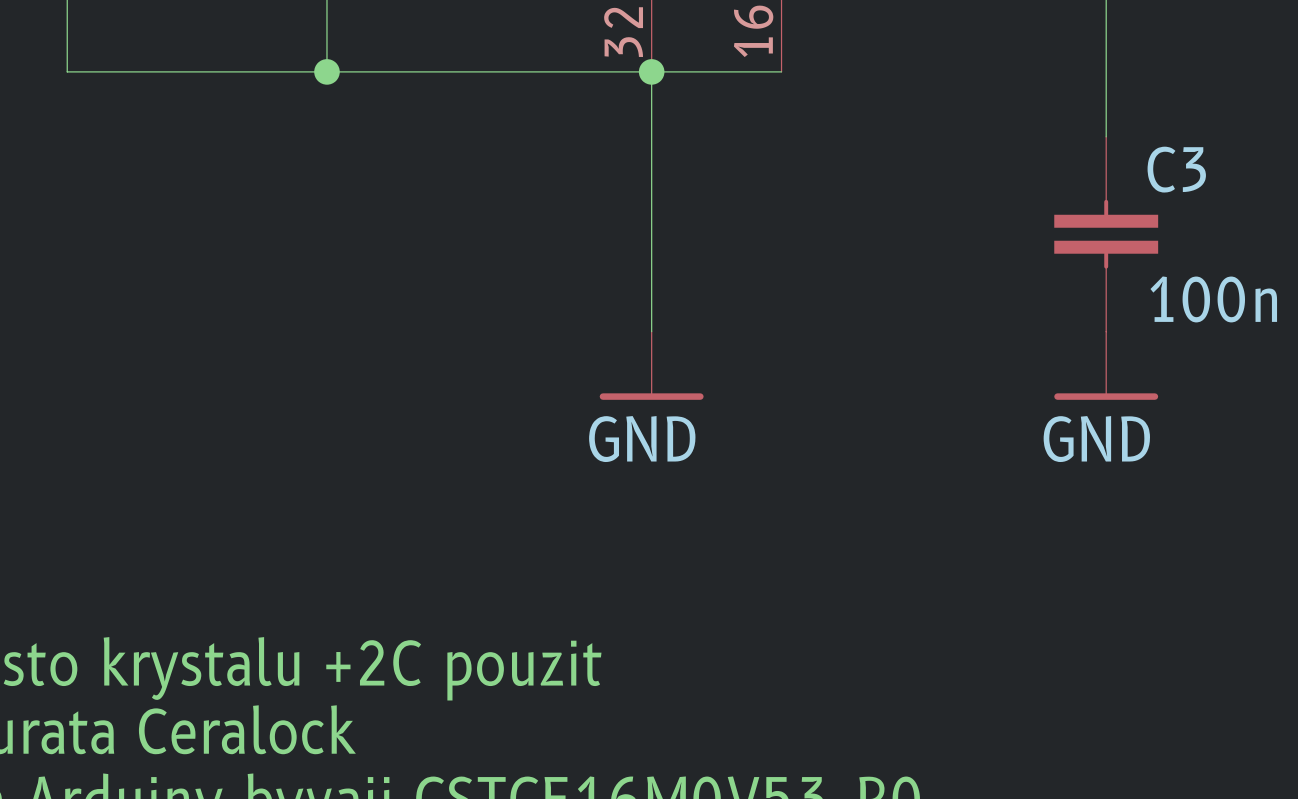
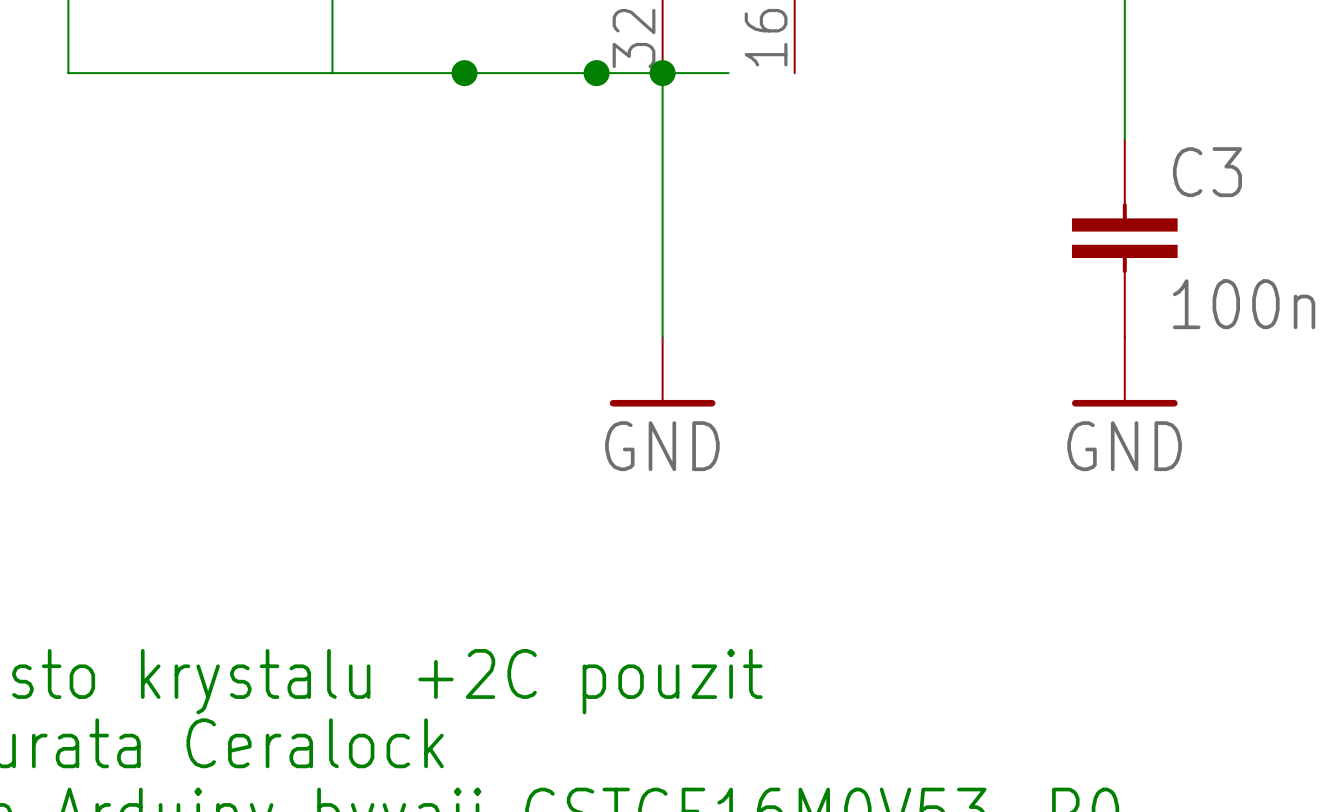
junction: (326, 71) -> none
junction: none -> (464, 73)
junction: none -> (596, 73)
wire: (716, 71) (781, 71) -> none

